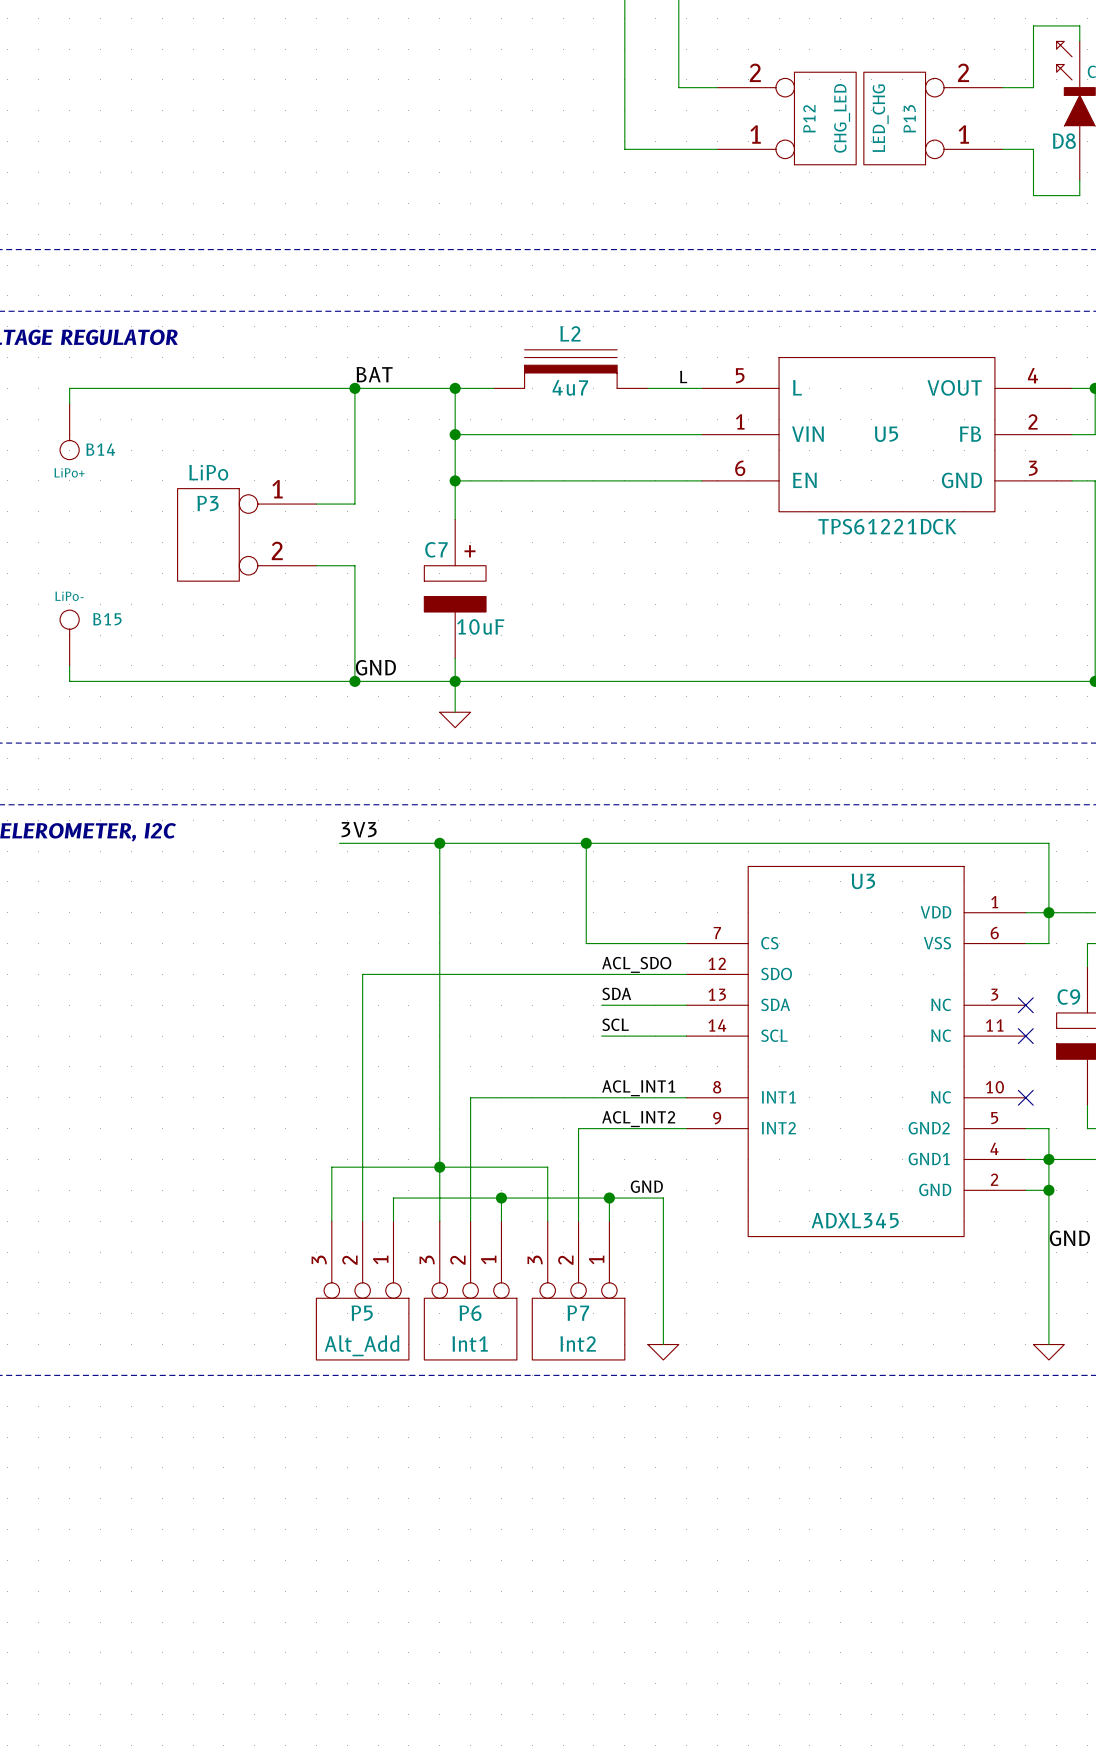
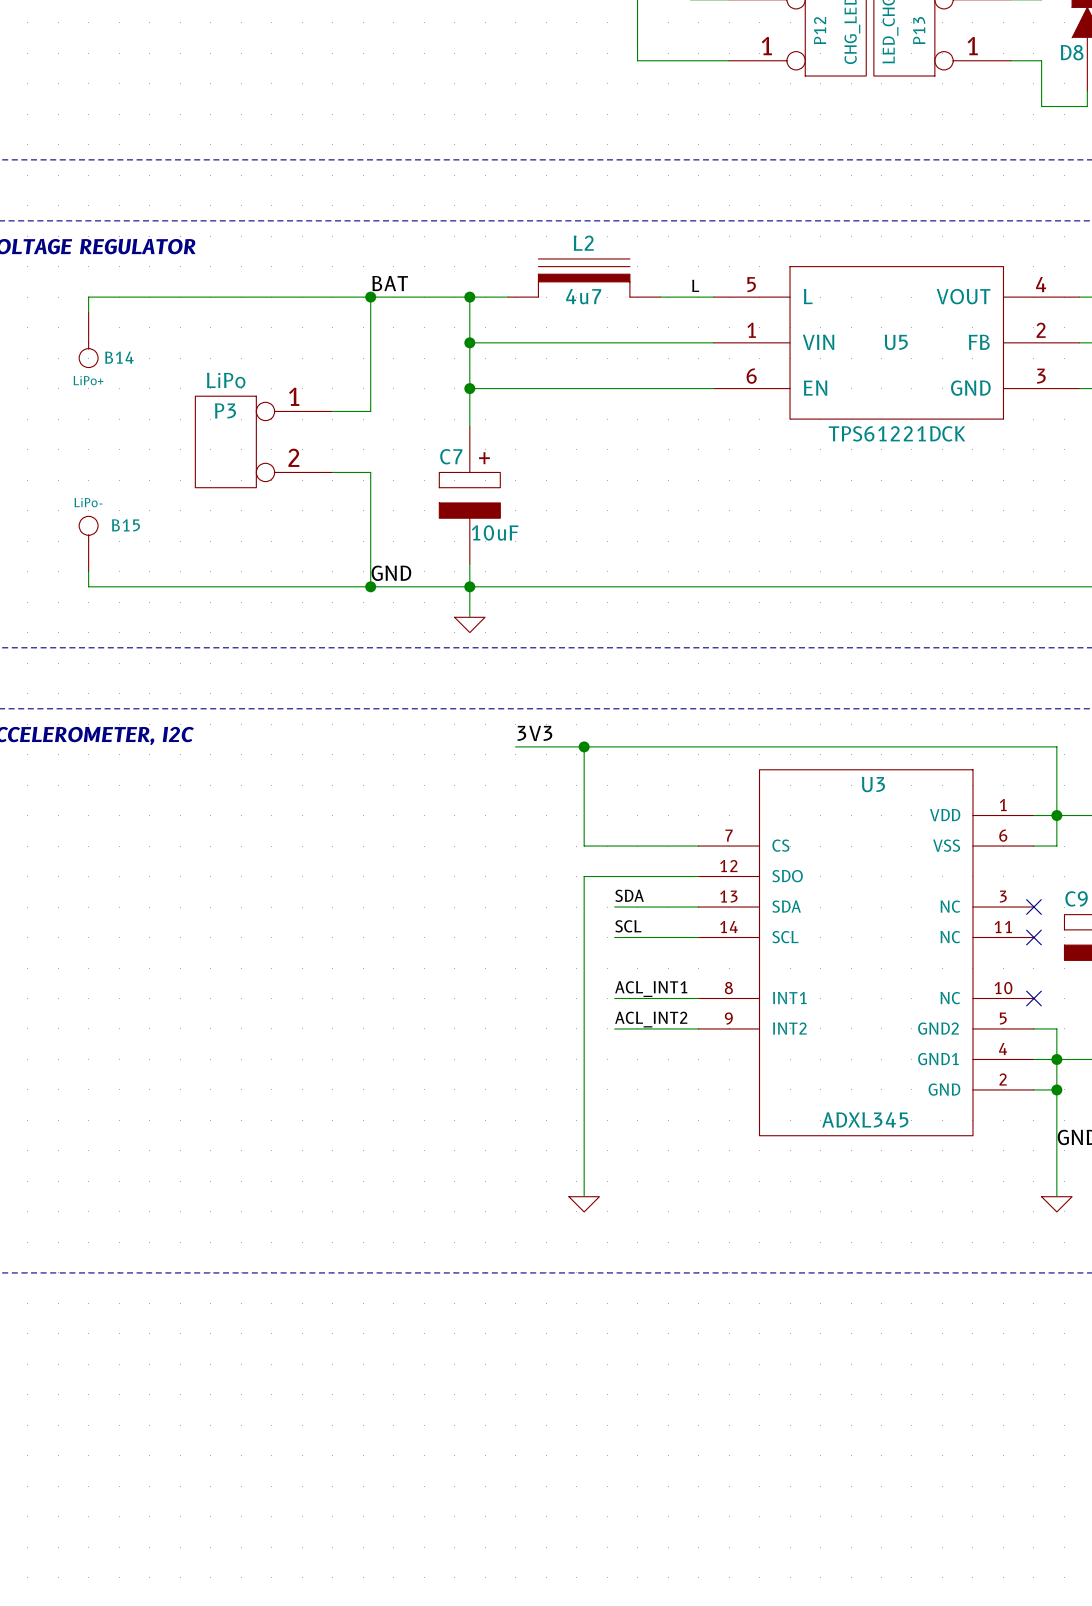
label position: 3V3 (359, 829) -> 3V3 (534, 733)
wire: (339, 843) (501, 843) -> none
wire: (439, 843) (439, 1221) -> none
junction: (439, 843) -> none
wire: (586, 843) (586, 943) -> (584, 746) (584, 846) (599, 846)
junction position: (586, 843) -> (584, 746)
label: ACL_SDO (636, 964) -> none
wire: (570, 974) (362, 974) (362, 1221) -> (584, 876) (584, 1196)
wire: (601, 1097) (470, 1097) (470, 1221) -> none
wire: (601, 1128) (578, 1128) (578, 1221) -> none
junction: (439, 1167) -> none
label: GND (646, 1186) -> none
wire: (501, 1198) (501, 1221) -> none
junction: (501, 1198) -> none
wire: (609, 1198) (609, 1221) -> none
junction: (609, 1198) -> none
wire: (331, 1221) (331, 1167) (547, 1167) (547, 1221) -> none
wire: (393, 1221) (393, 1198) (663, 1198) (663, 1344) -> none
P5: Alt_Add (362, 1290) -> none
P6: Int1 (470, 1290) -> none
P7: Int2 (578, 1290) -> none
wire: (1048, 1298) (1048, 1344) -> none
power symbol position: (663, 1352) -> (584, 1204)
power symbol position: (1048, 1352) -> (1056, 1204)

